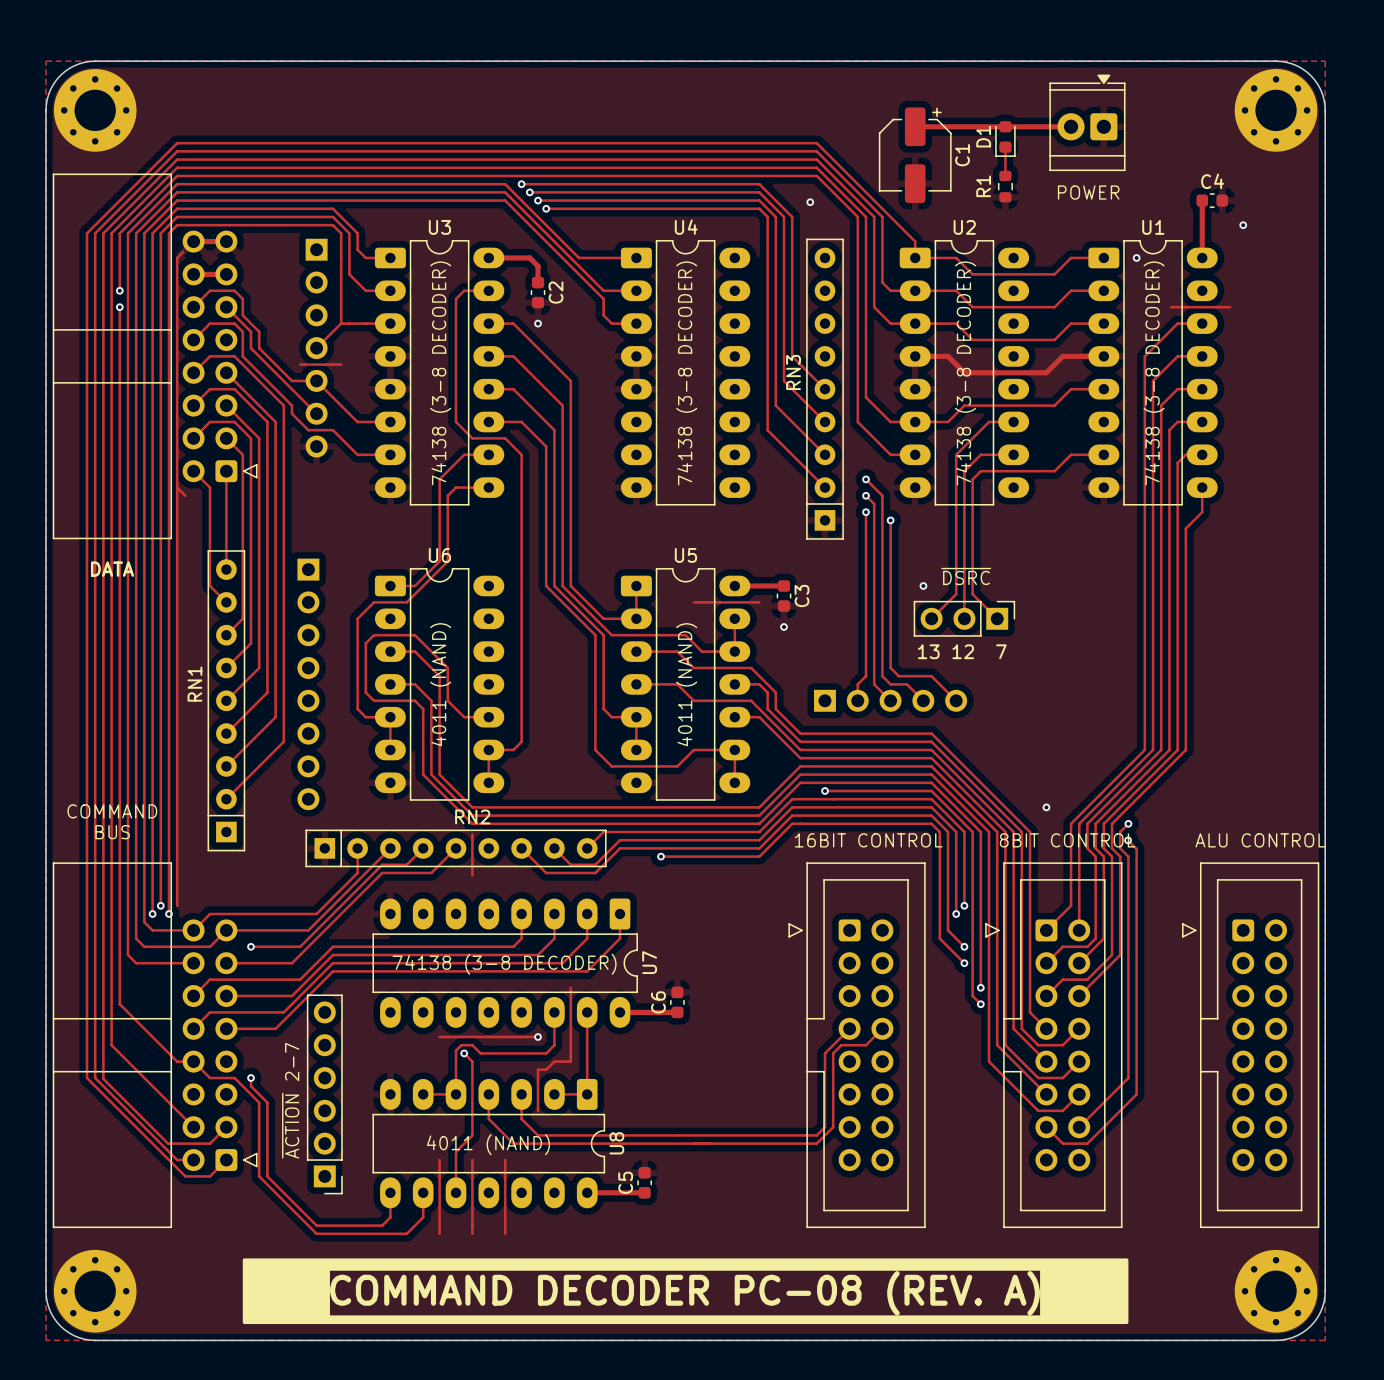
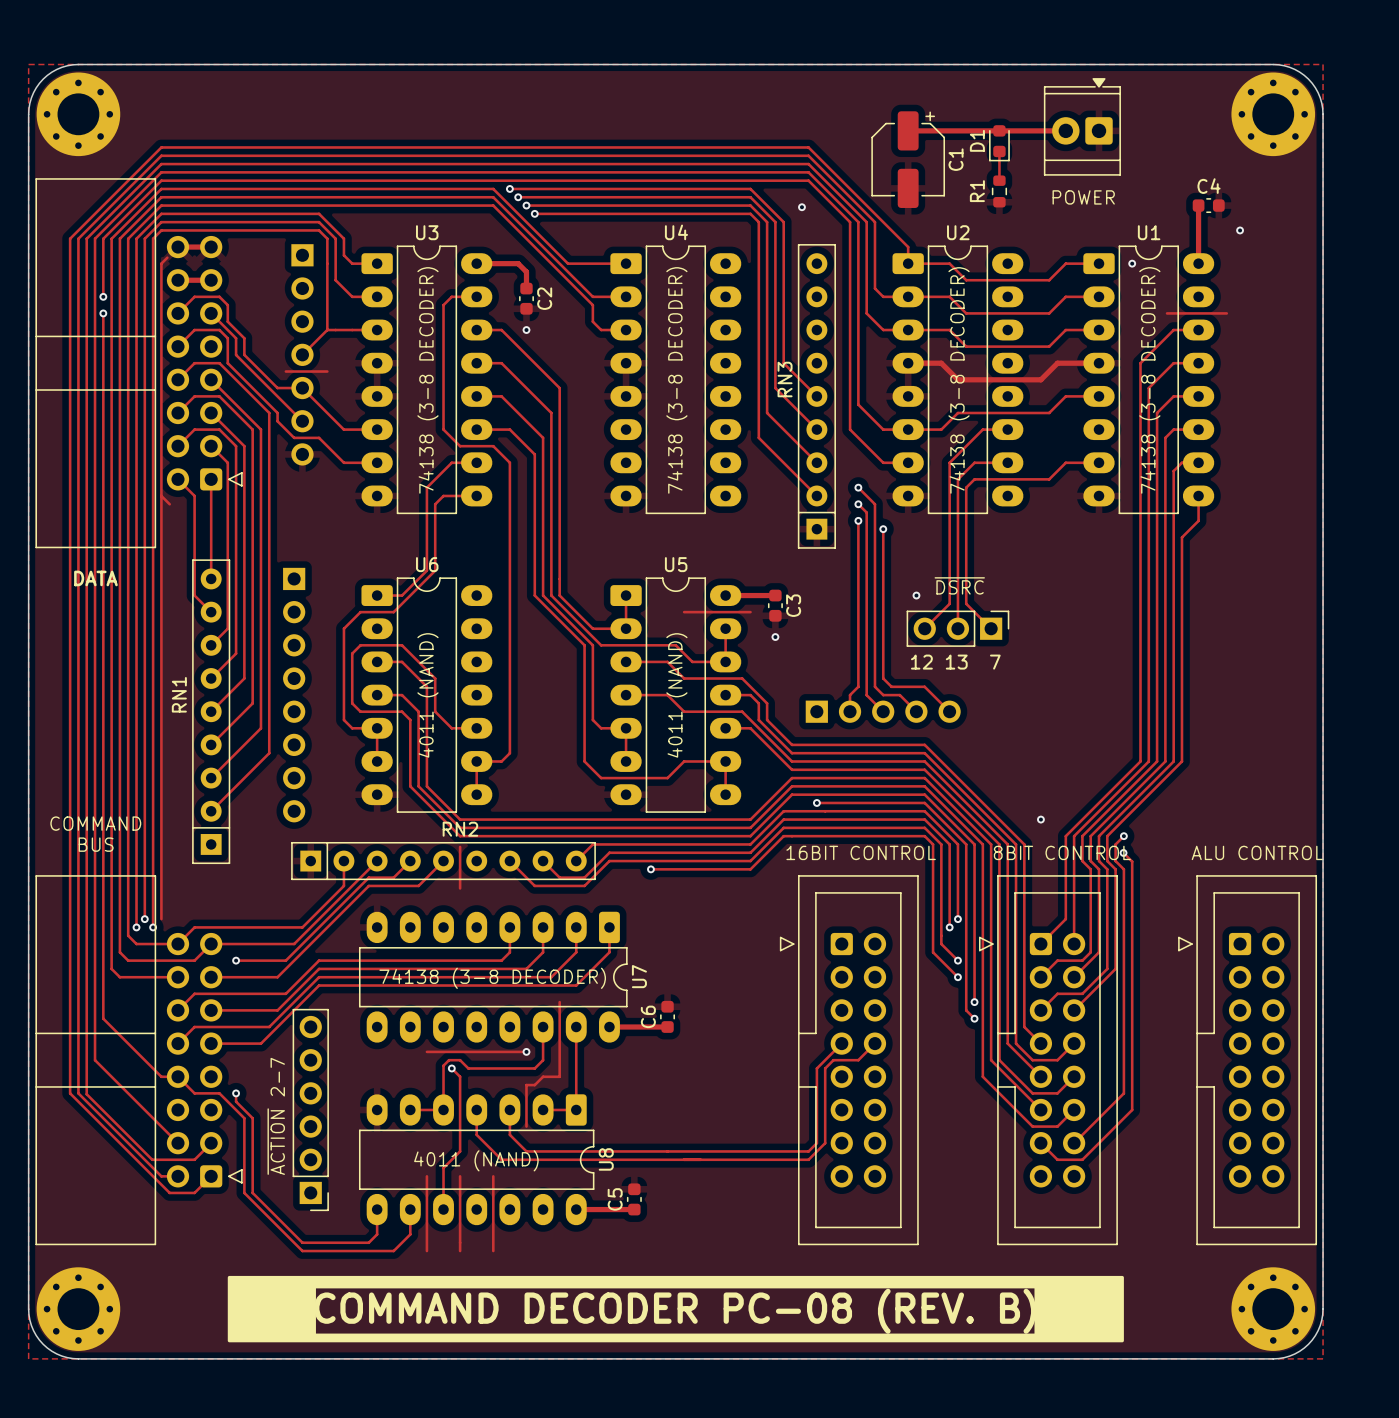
text: 13 12 7 (962, 651) -> 12 13 7 (955, 662)
text: COMMAND DECODER PC-08 (REV. A) (685, 1293) -> COMMAND DECODER PC-08 (REV. B) (675, 1311)

